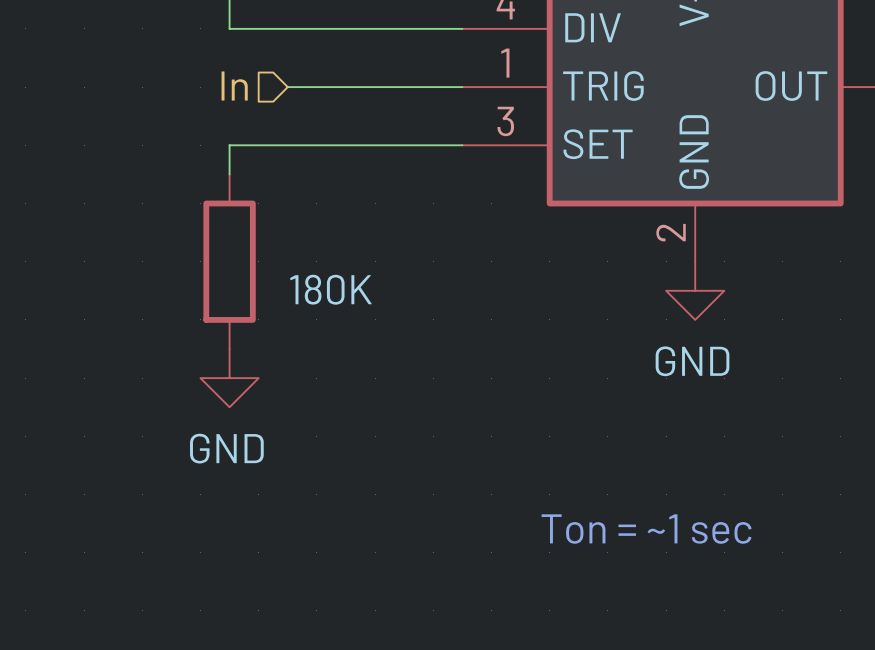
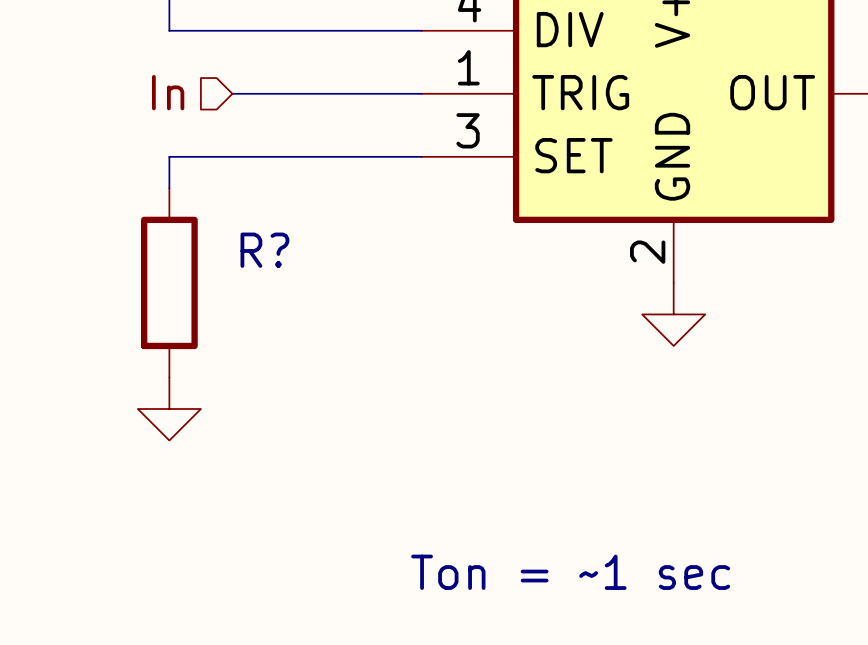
R? name: none -> R? (264, 250)
R? value: 180K (330, 289) -> none
power symbol text: GND (692, 361) -> none
power symbol text: GND (226, 448) -> none

